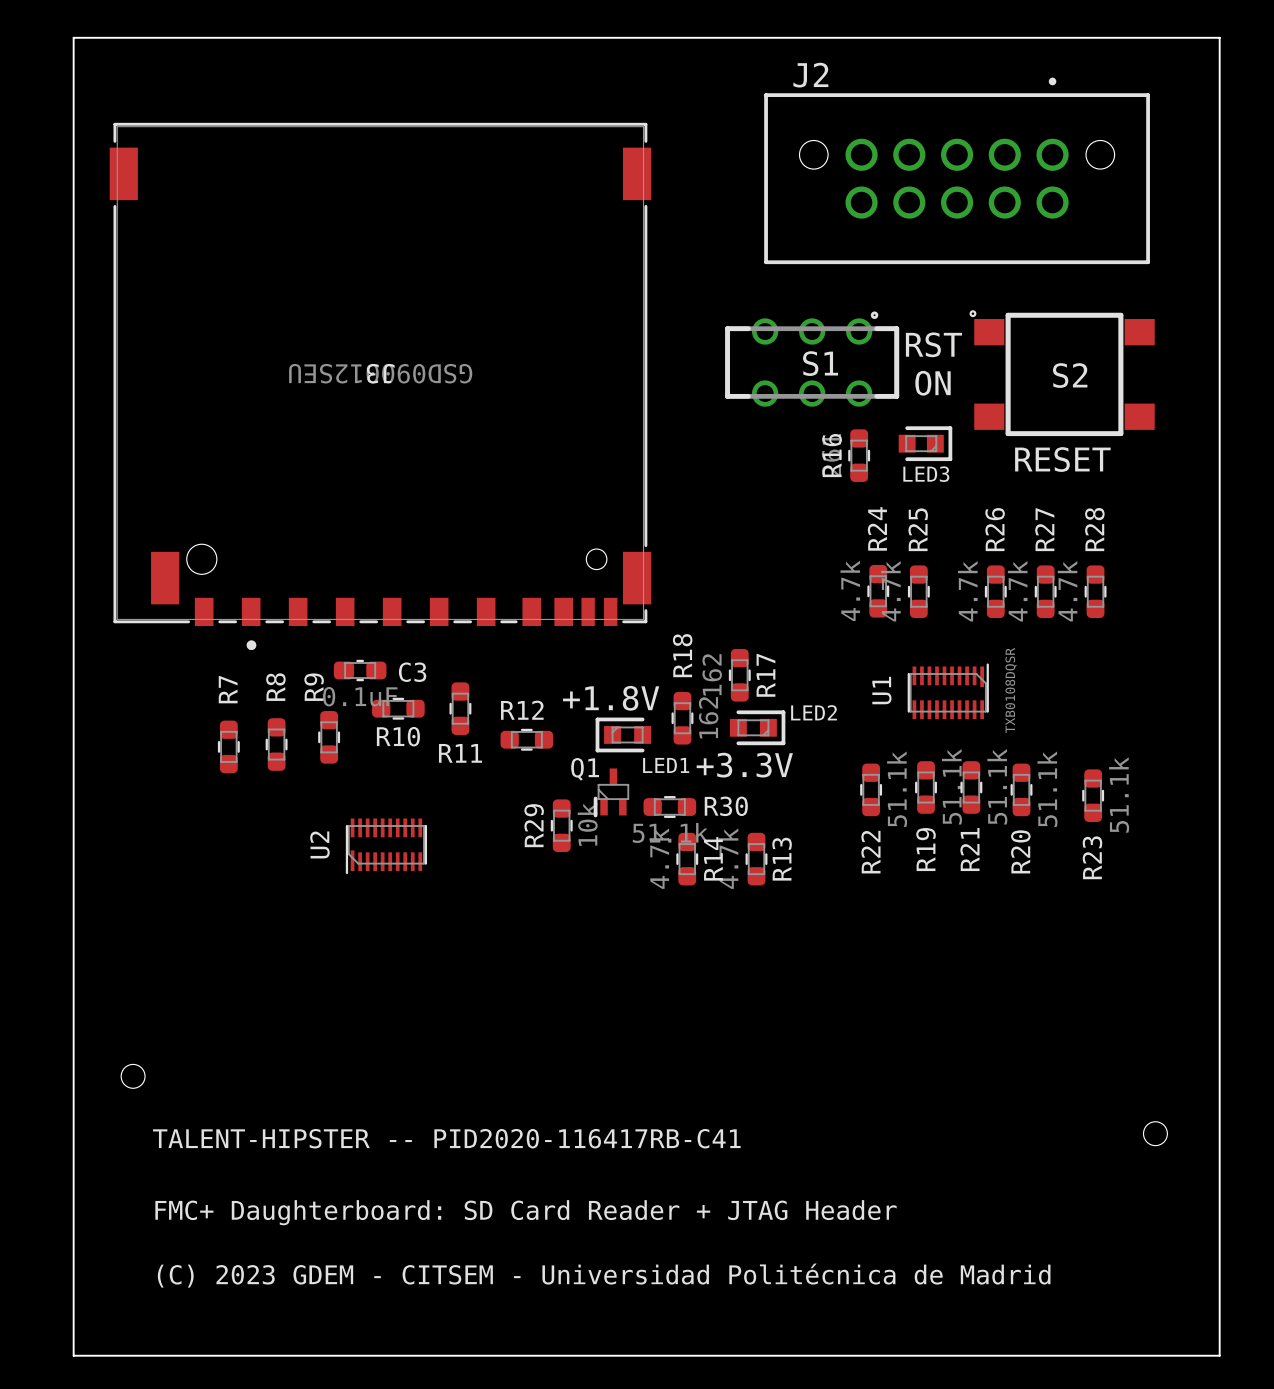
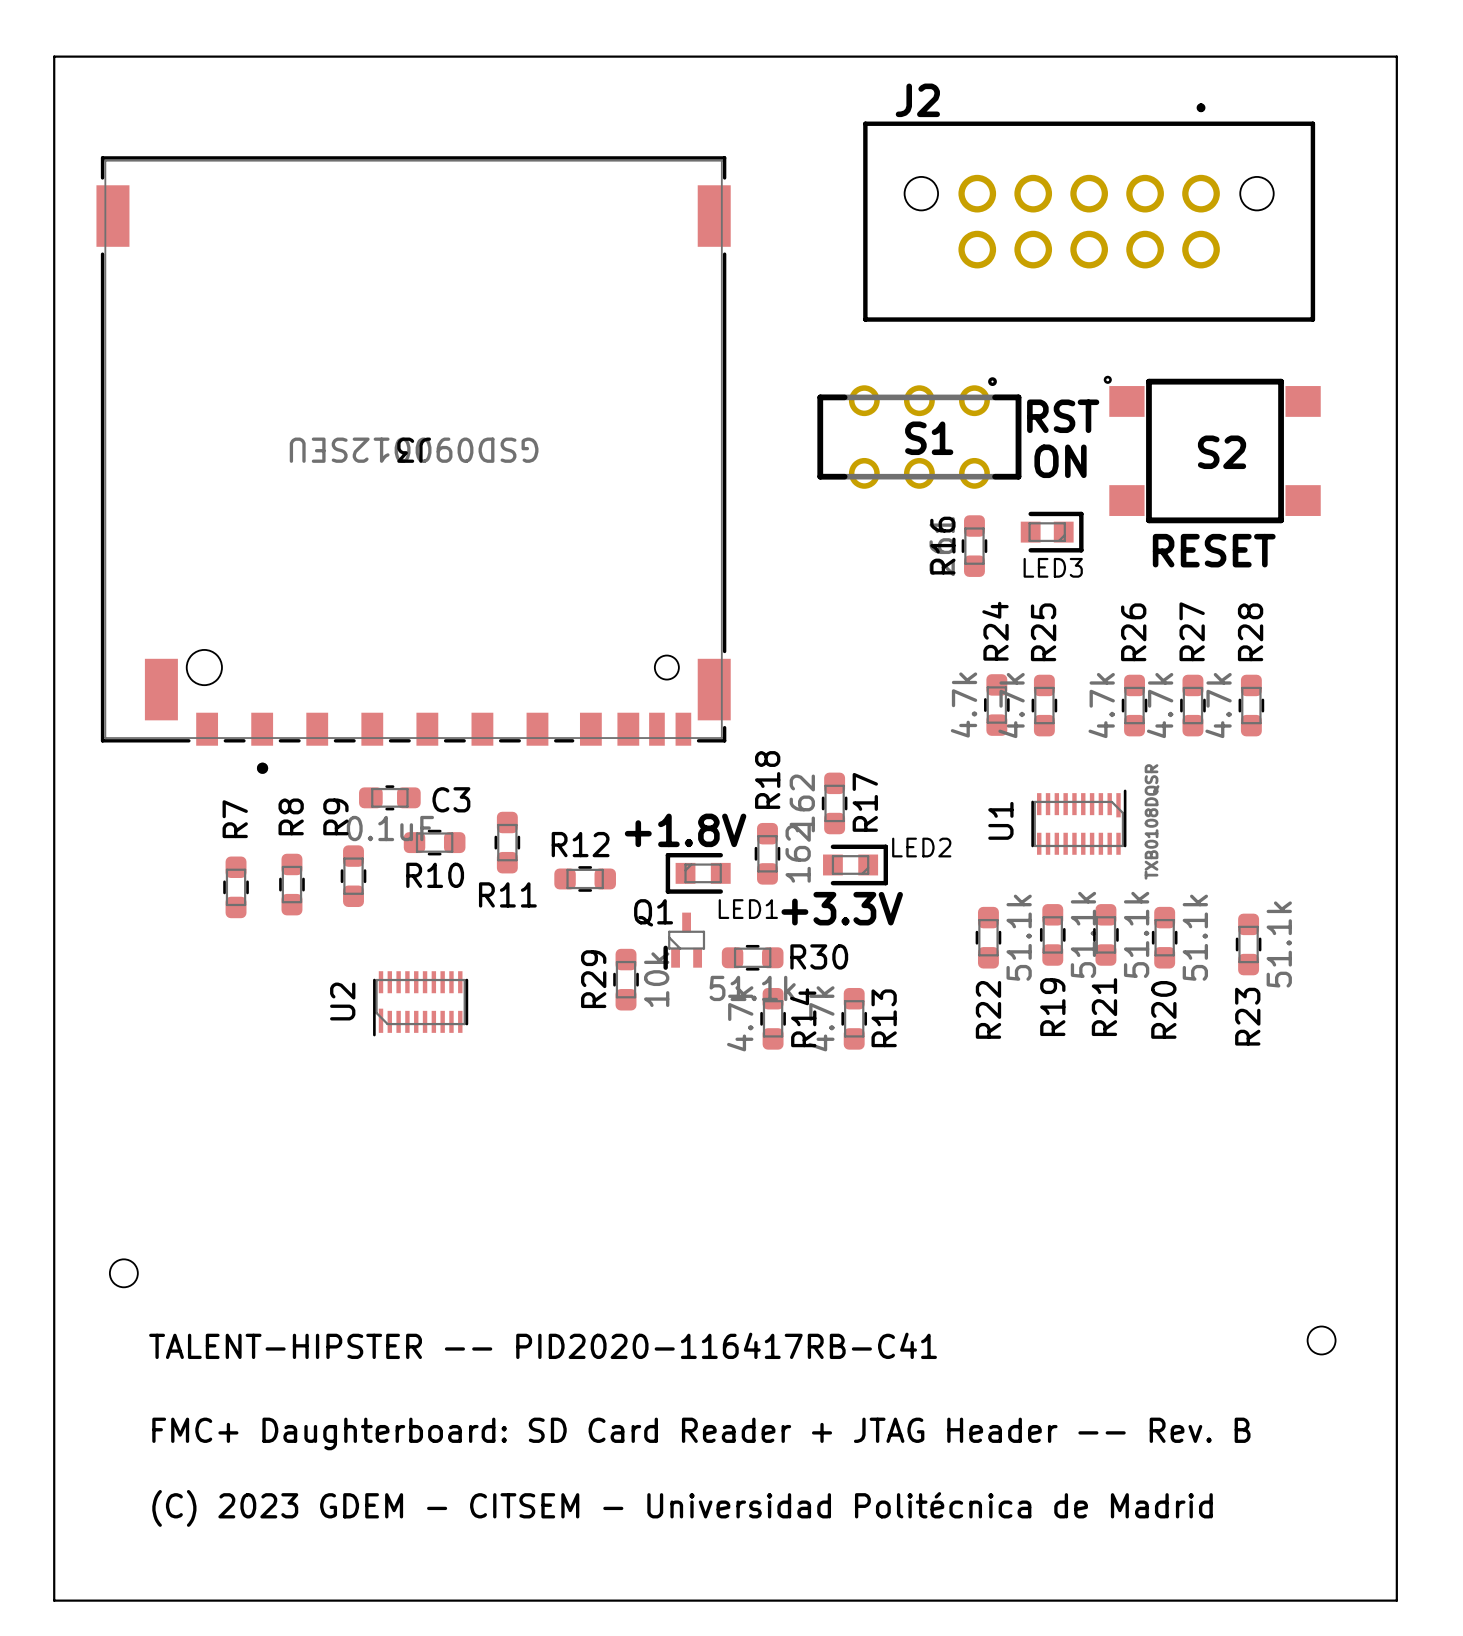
text: FMC+ Daughterboard: SD Card Reader + JTAG Header (526, 1212) -> FMC+ Daughterboard: SD Card Reader + JTAG Header -- Rev. B (701, 1433)

